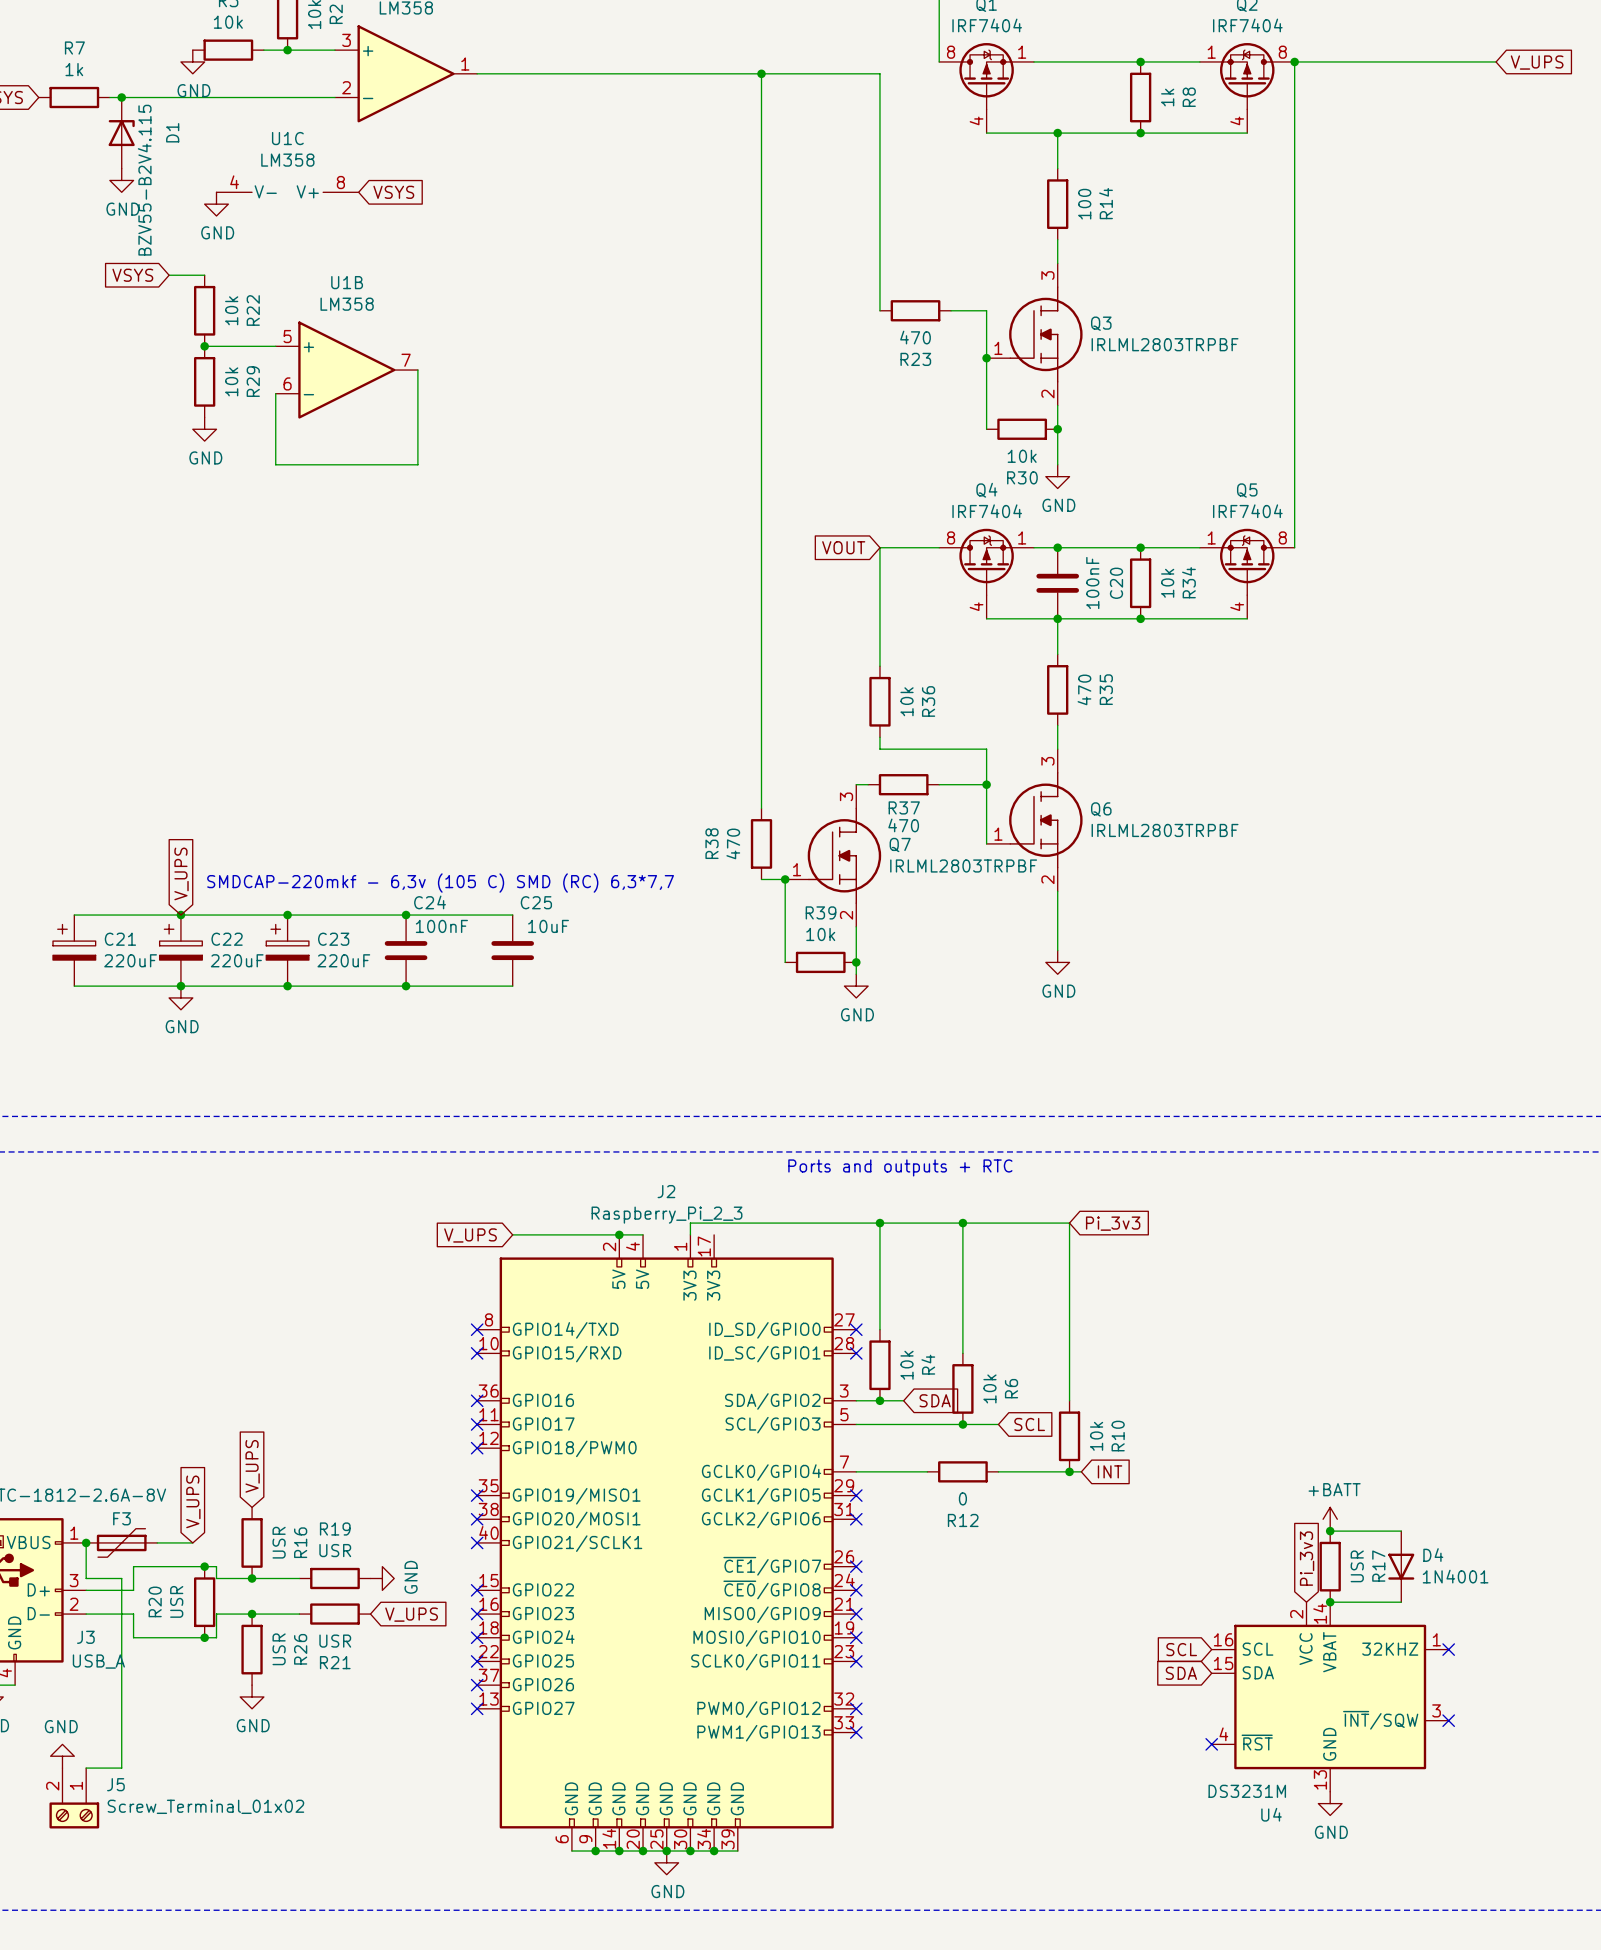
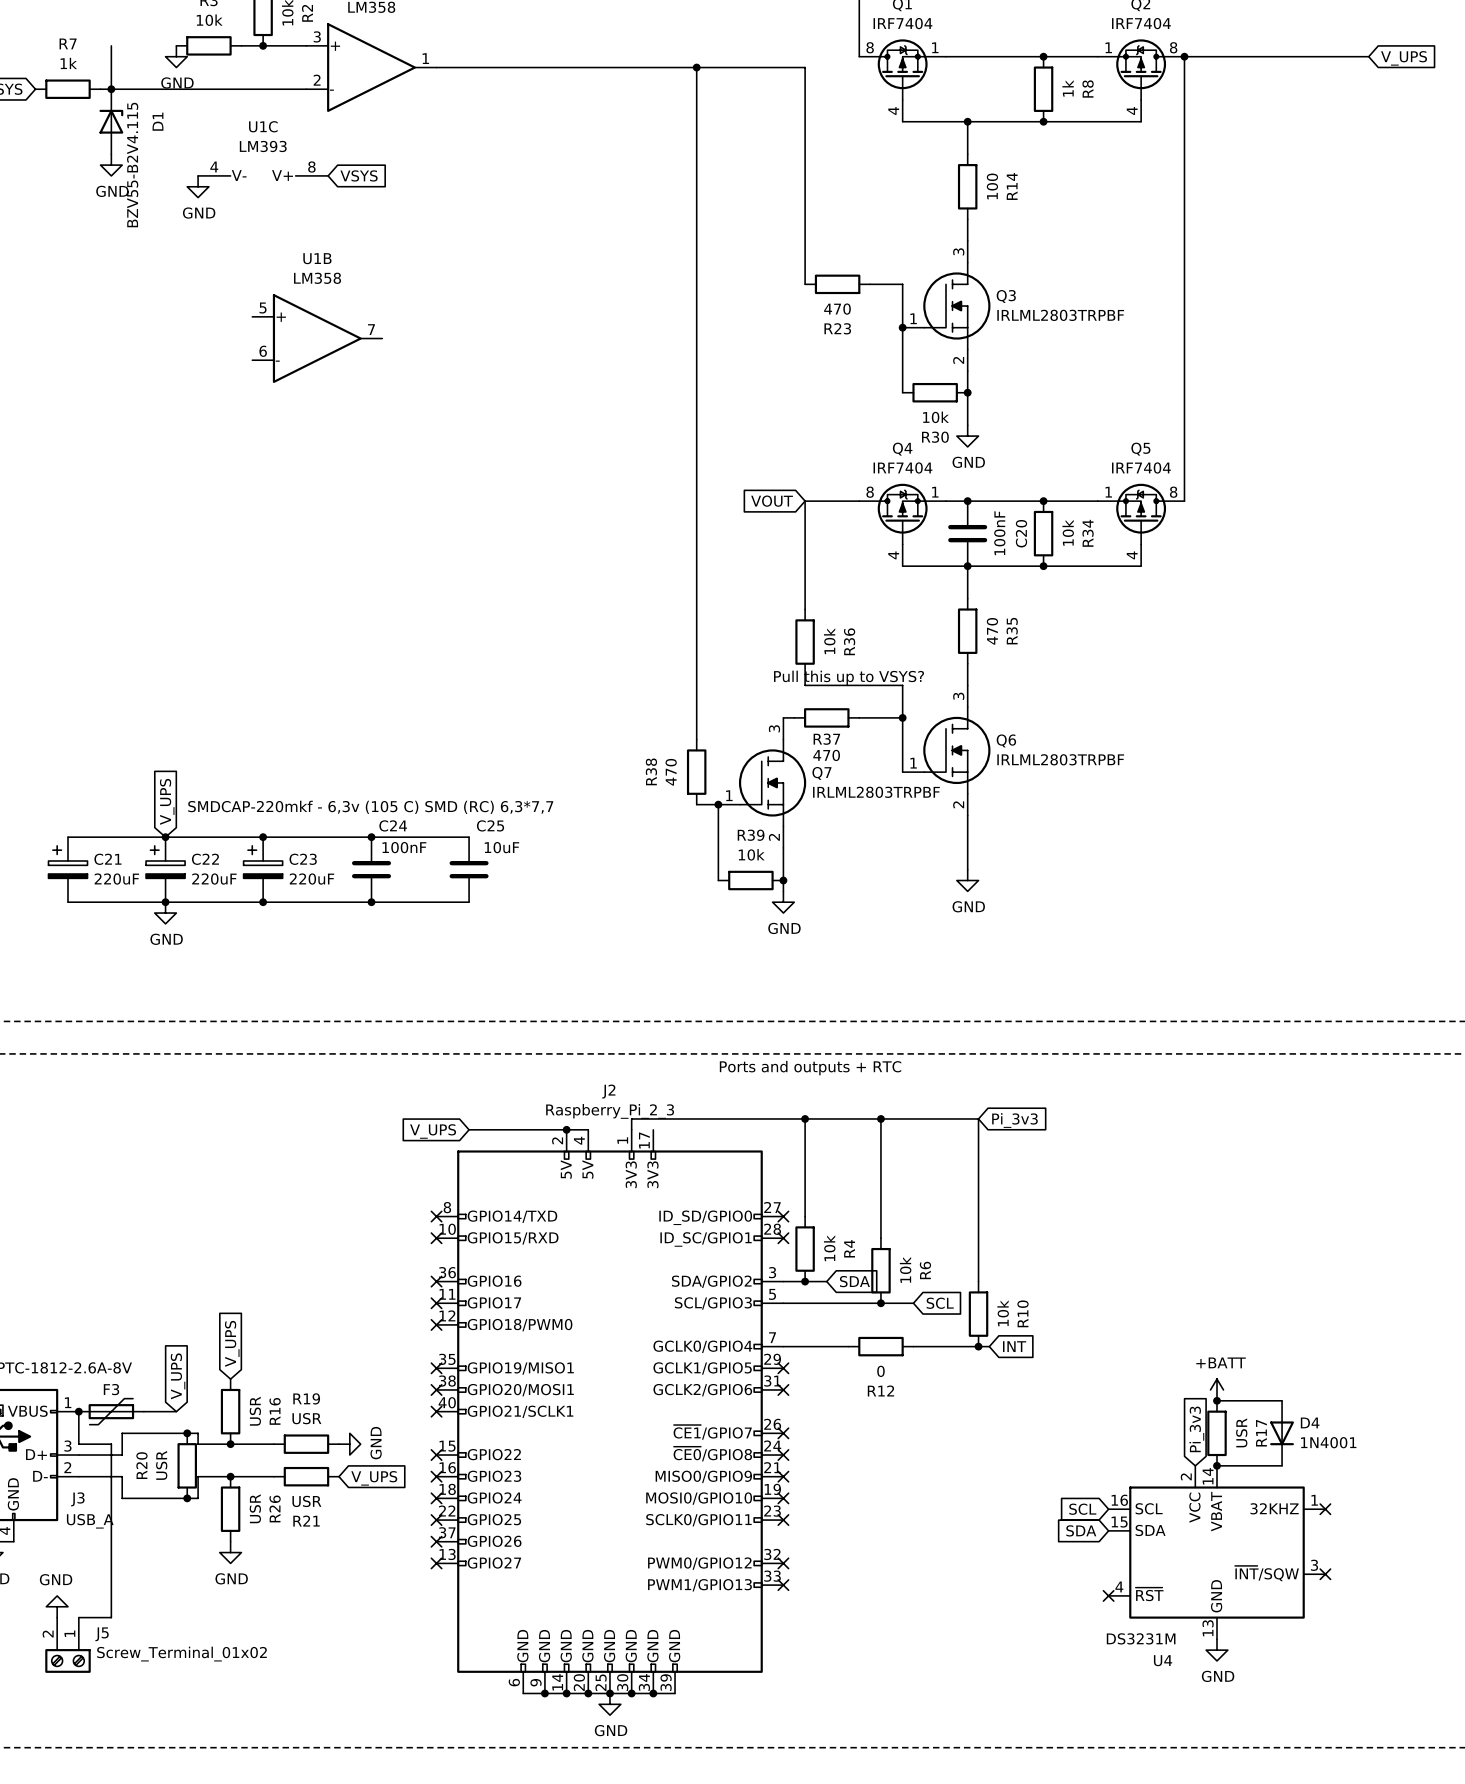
wire: none -> (111, 45) (111, 89)
U1C value: LM358 (287, 160) -> LM393 (263, 146)
global label: VSYS (132, 275) -> none
wire: (169, 275) (204, 275) -> none
R22: 10k (204, 310) -> none
wire: (204, 346) (275, 346) -> none
junction: (204, 346) -> none
wire: (417, 370) (417, 464) (275, 464) (275, 393) -> none
R29: 10k (204, 381) -> none
power symbol: GND (204, 429) -> none
text: none -> Pull this up to VSYS? (849, 677)

